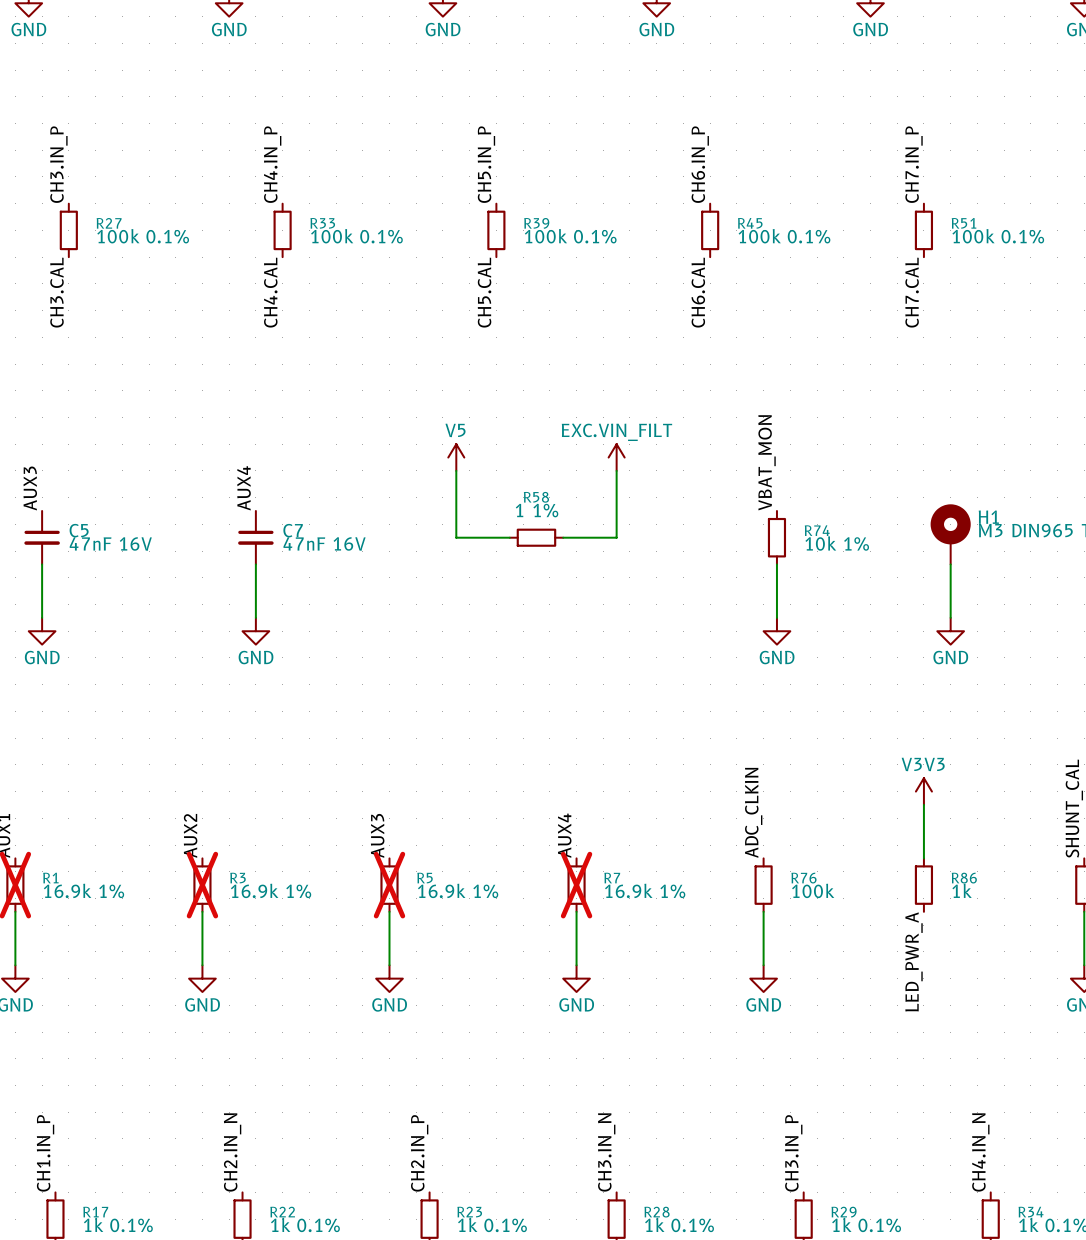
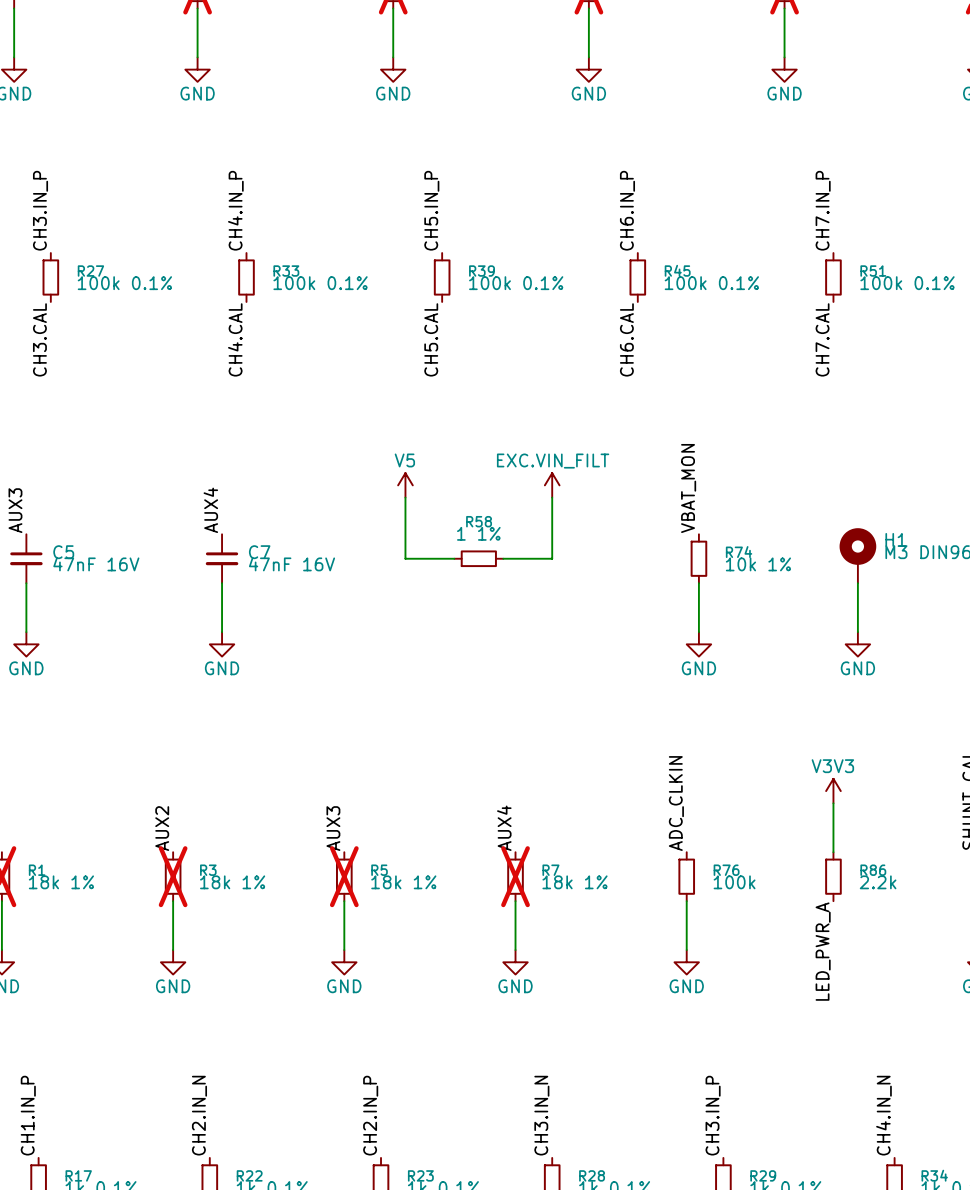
R1 value: 16.9k 1% (83, 890) -> 18k 1% (61, 882)
R3 value: 16.9k 1% (271, 890) -> 18k 1% (232, 882)
R5 value: 16.9k 1% (458, 890) -> 18k 1% (403, 882)
R7 value: 16.9k 1% (645, 890) -> 18k 1% (575, 882)
R86 value: 1k (962, 890) -> 2.2k (878, 882)

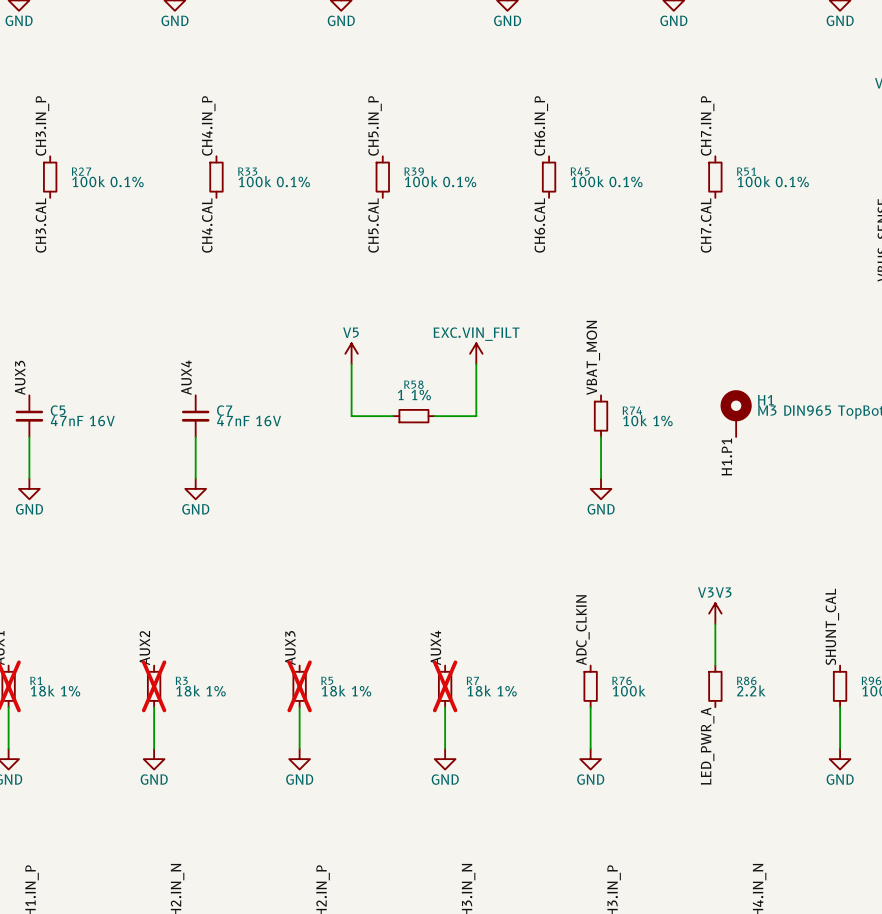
wire: (857, 583) (857, 632) -> none
label: none -> H1.P1 (726, 457)
power symbol: GND (857, 644) -> none

